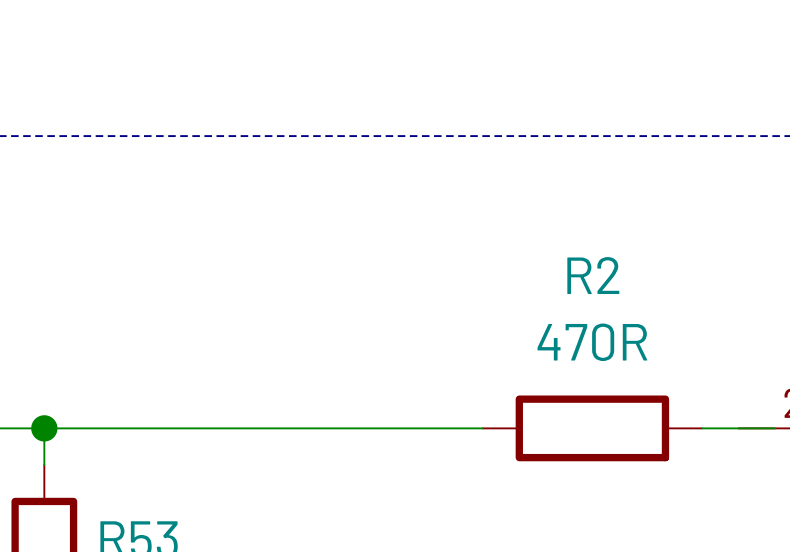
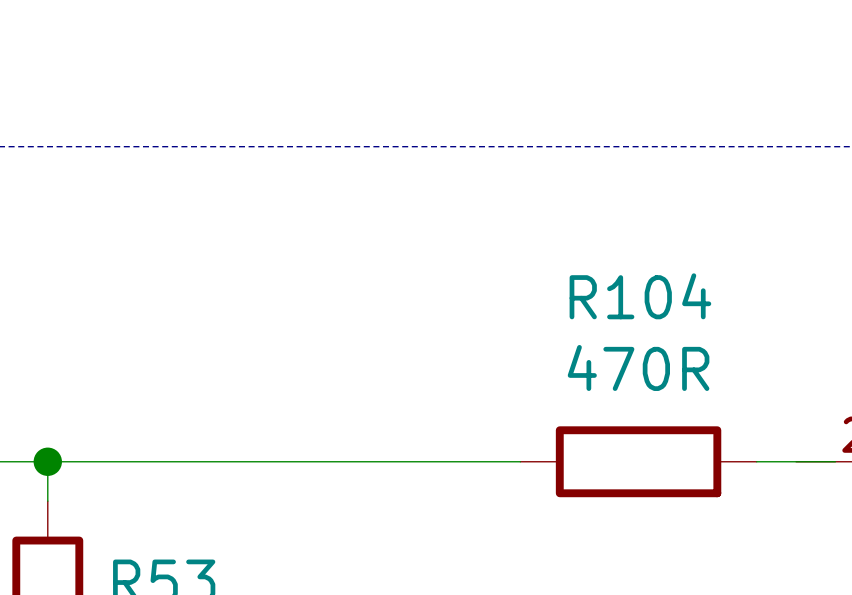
R2 name: R2 (593, 275) -> R104 (640, 296)

